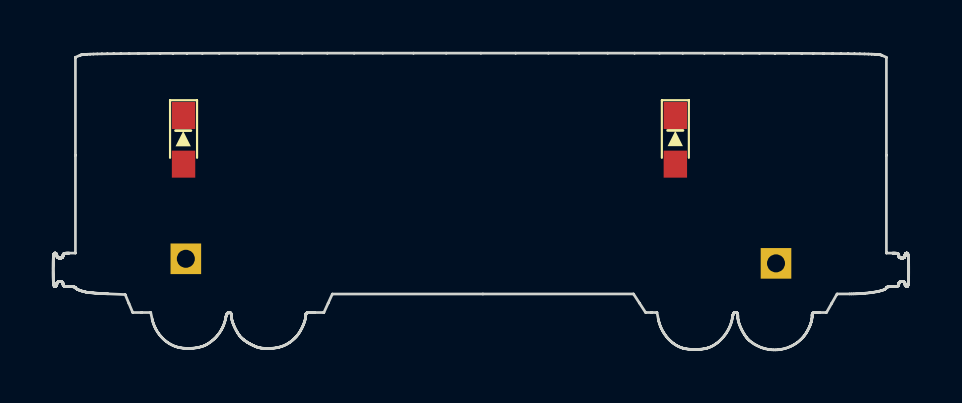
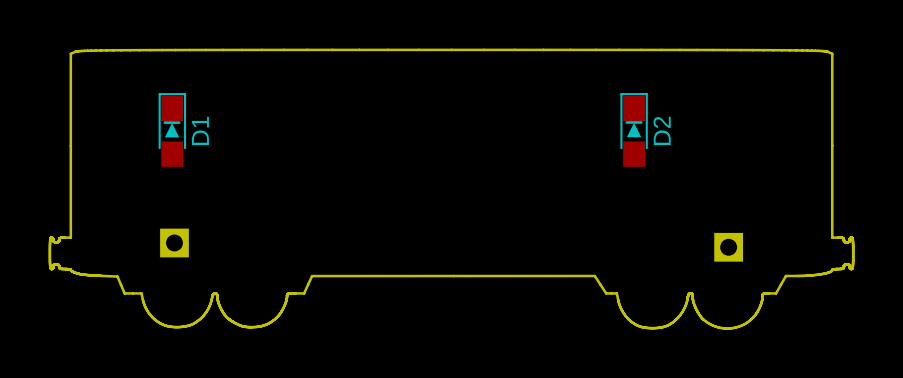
D1 name: none -> D1 (200, 130)
D2 name: none -> D2 (662, 130)

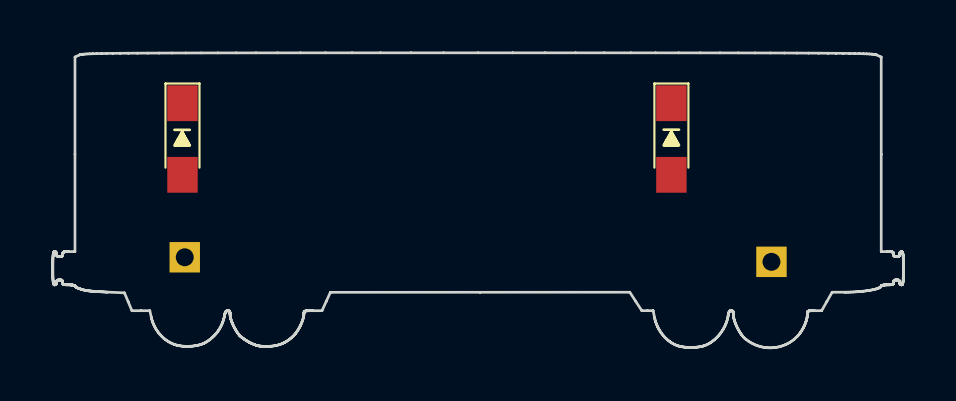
D1: (172, 129) -> none
part: none -> (182, 137)
D2: (634, 129) -> none
part: none -> (671, 137)

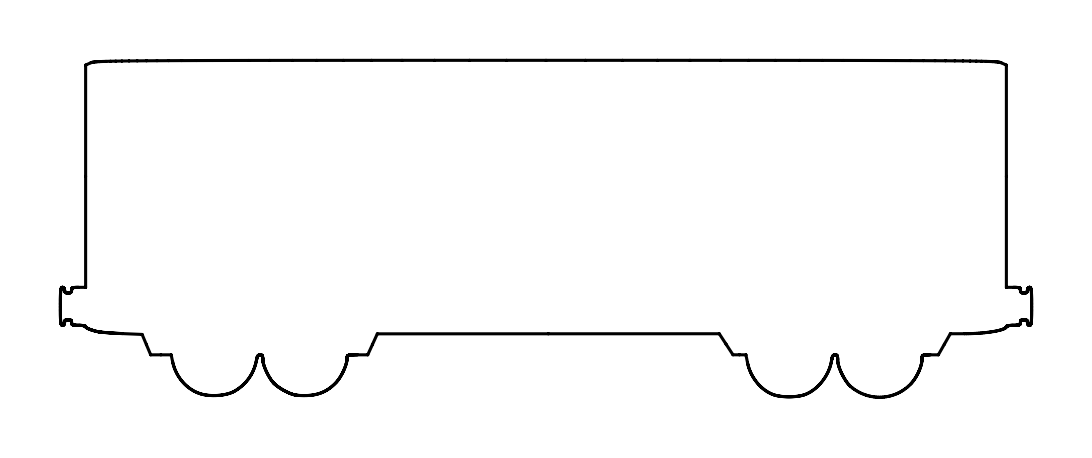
drawing: [173, 128, 192, 132] -> none
drawing: [662, 128, 681, 132] -> none
part: (182, 137) -> none
part: (671, 137) -> none
part: (184, 257) -> none
part: (771, 261) -> none

